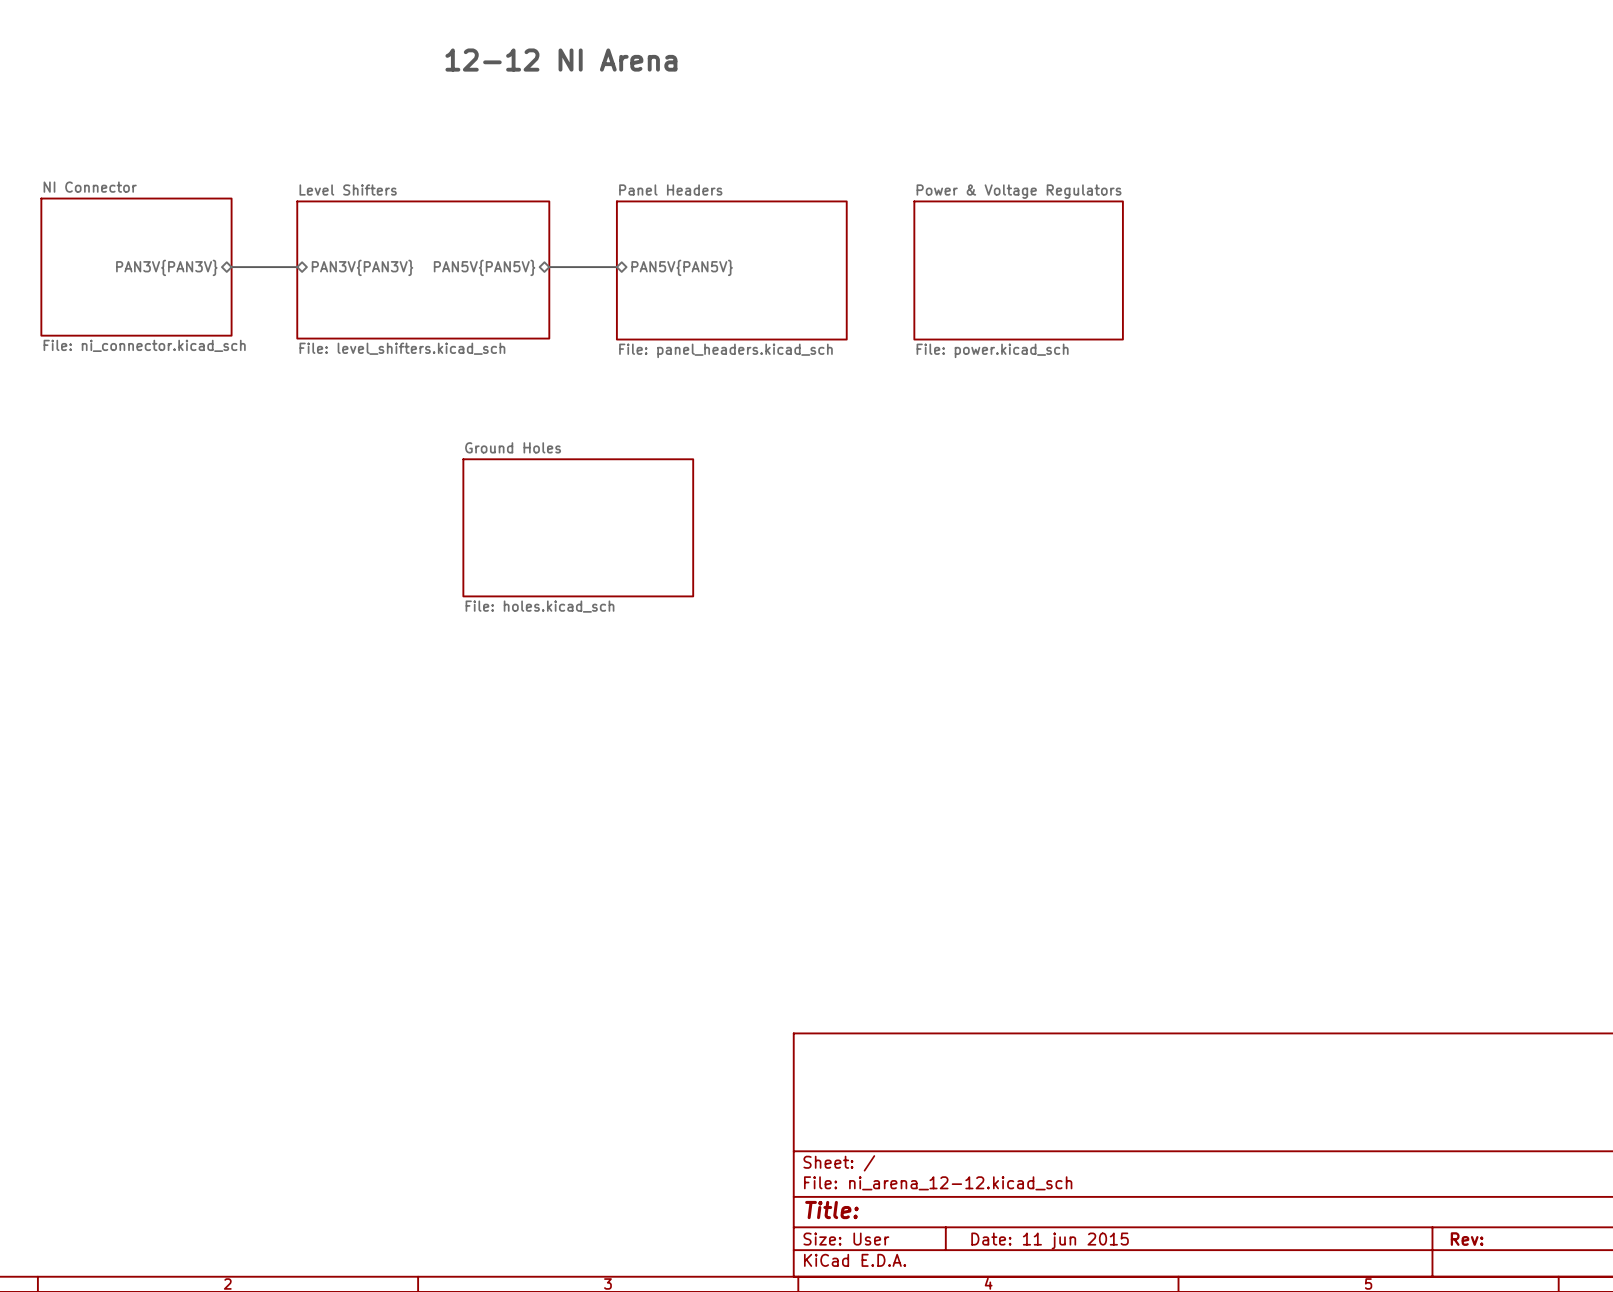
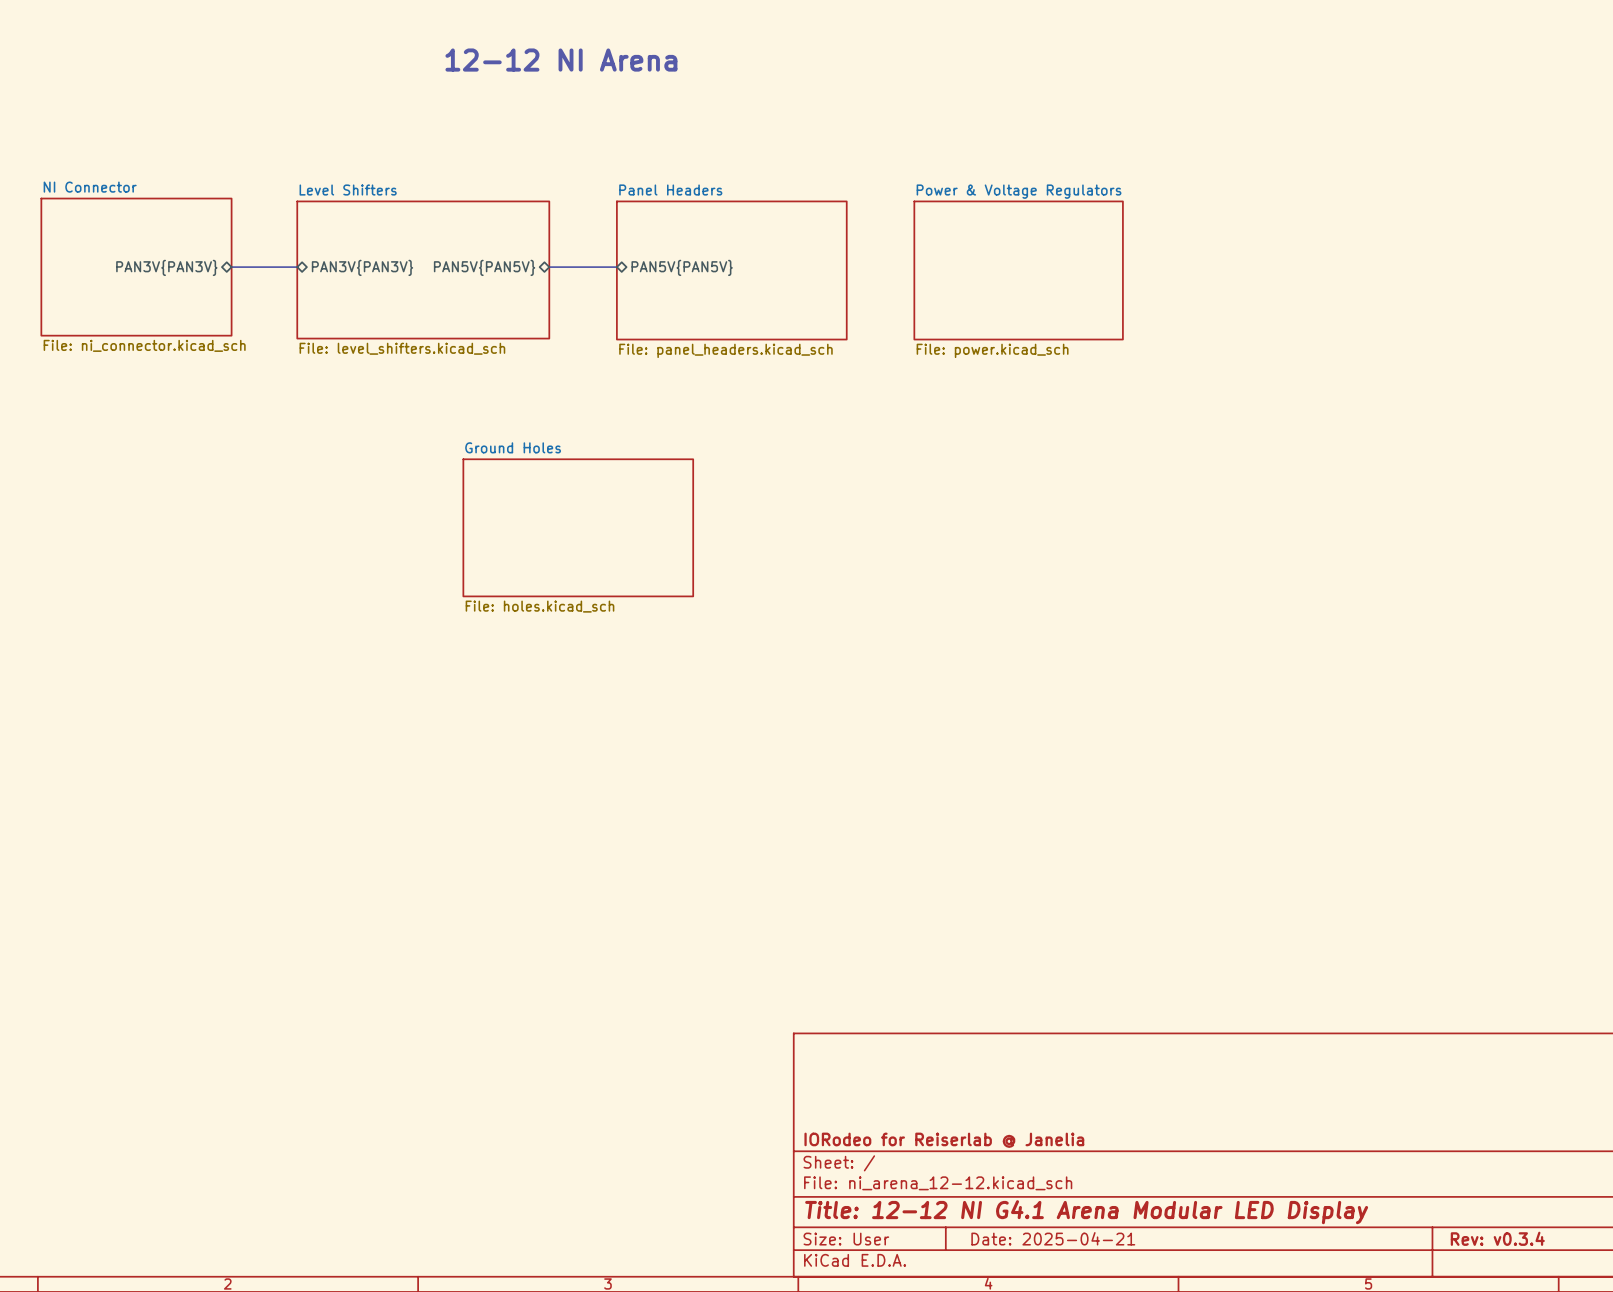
title block: none -> IORodeo for Reiserlab @ Janelia (944, 1140)
title block: Title: (831, 1210) -> Title: 12-12 NI G4.1 Arena Modular LED Display (1086, 1212)
title block: Rev: (1467, 1239) -> Rev: v0.3.4 (1497, 1238)
title block: Date: 11 jun 2015 (1050, 1240) -> Date: 2025-04-21 (1053, 1238)

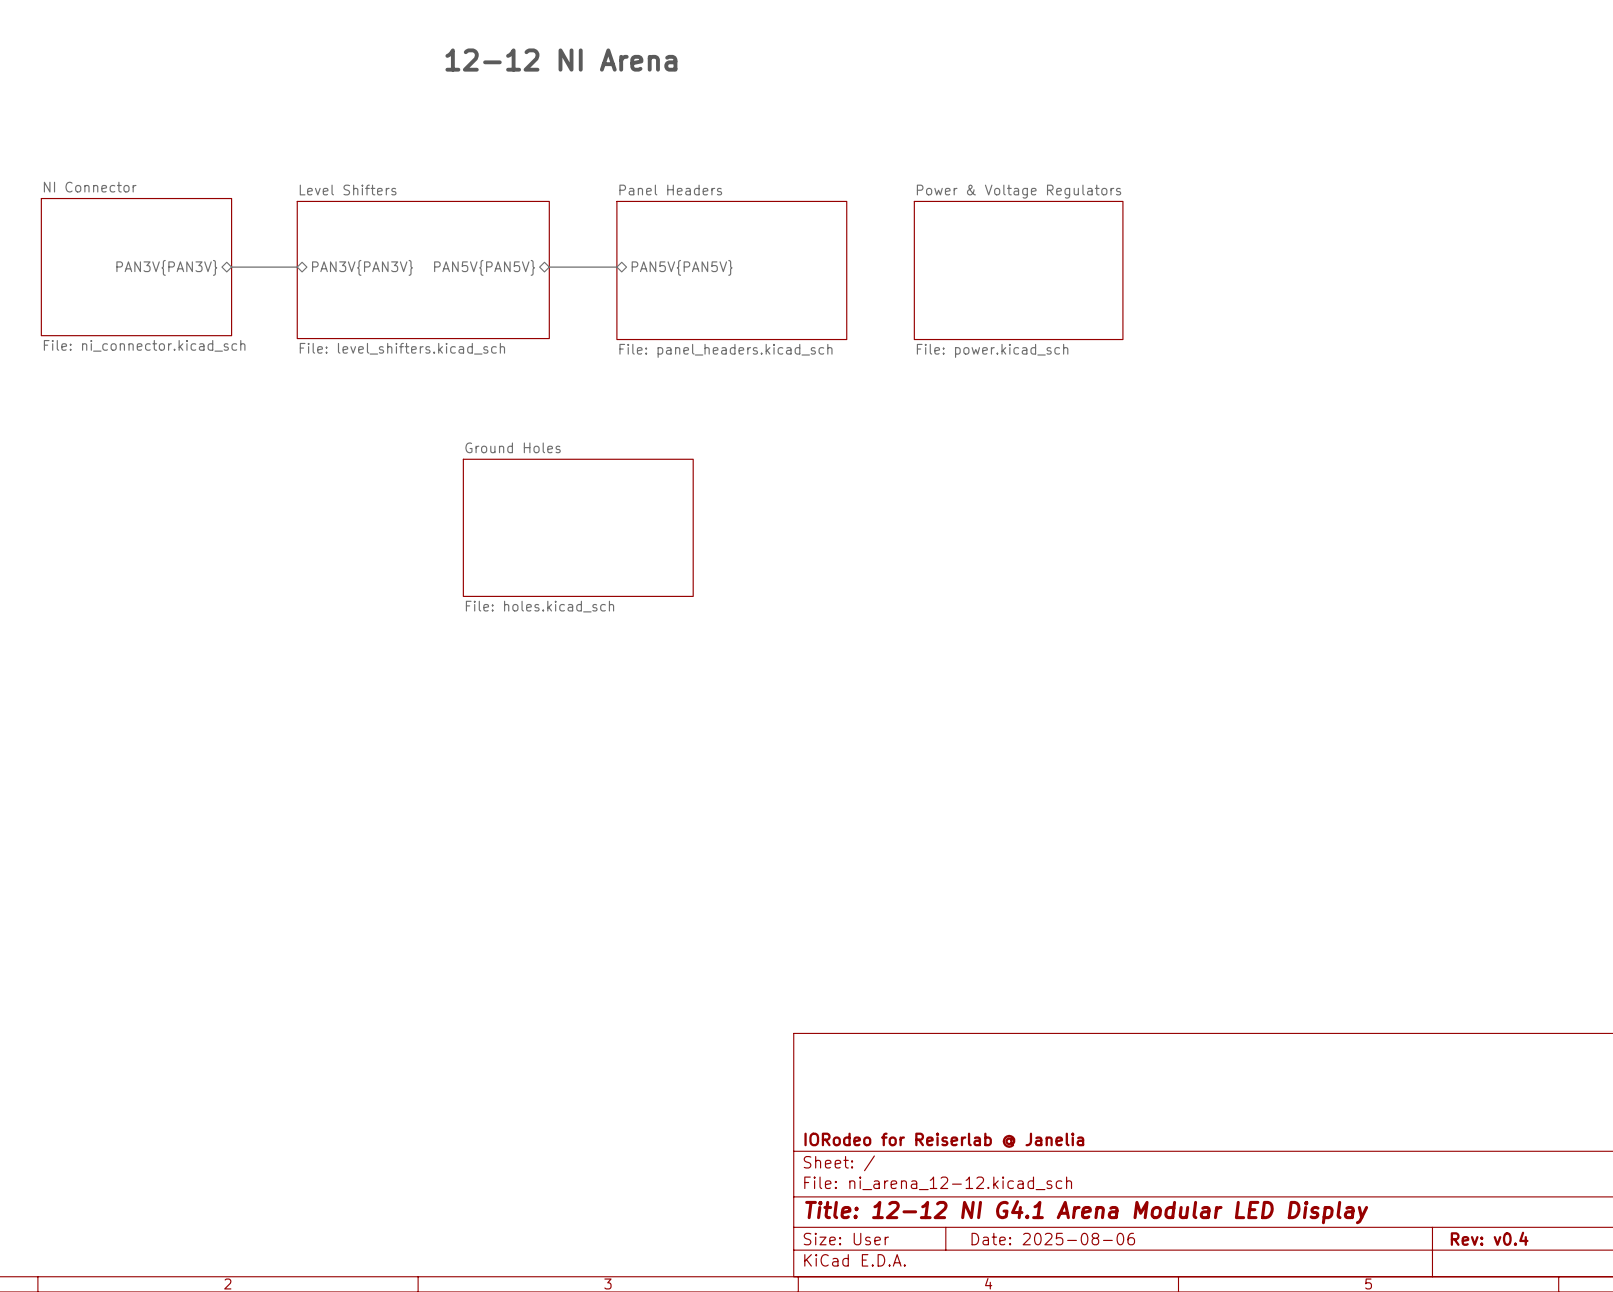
title block: Date: 2025-04-21 (1053, 1238) -> Date: 2025-08-06 (1053, 1239)
title block: Rev: v0.3.4 (1497, 1238) -> Rev: v0.4 (1489, 1238)

